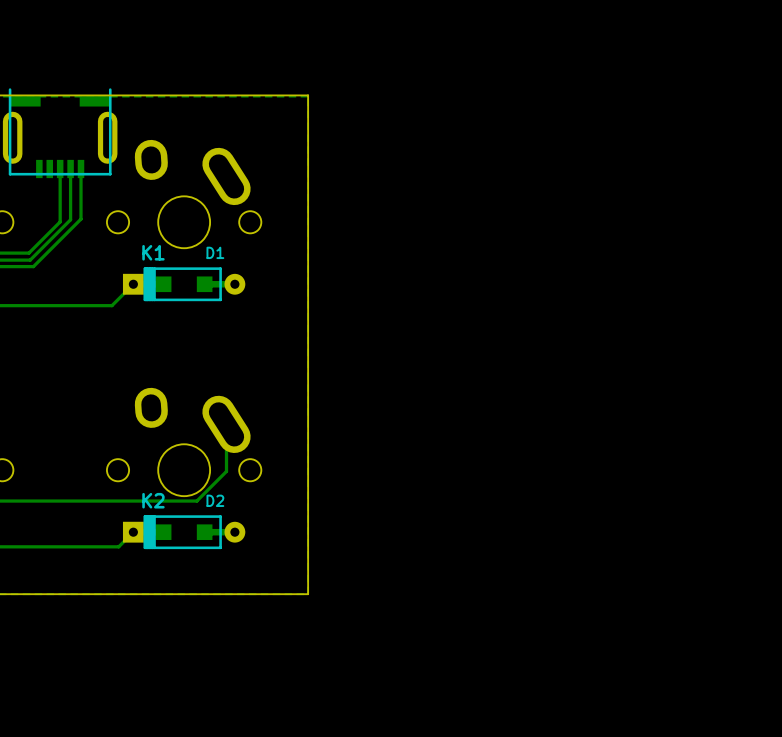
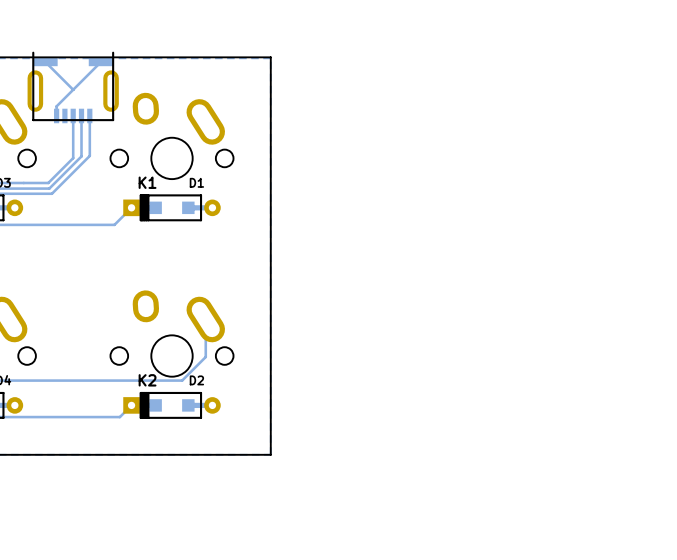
track: none -> (45, 62) (73, 89)
track: none -> (100, 62) (56, 106) (56, 115)

